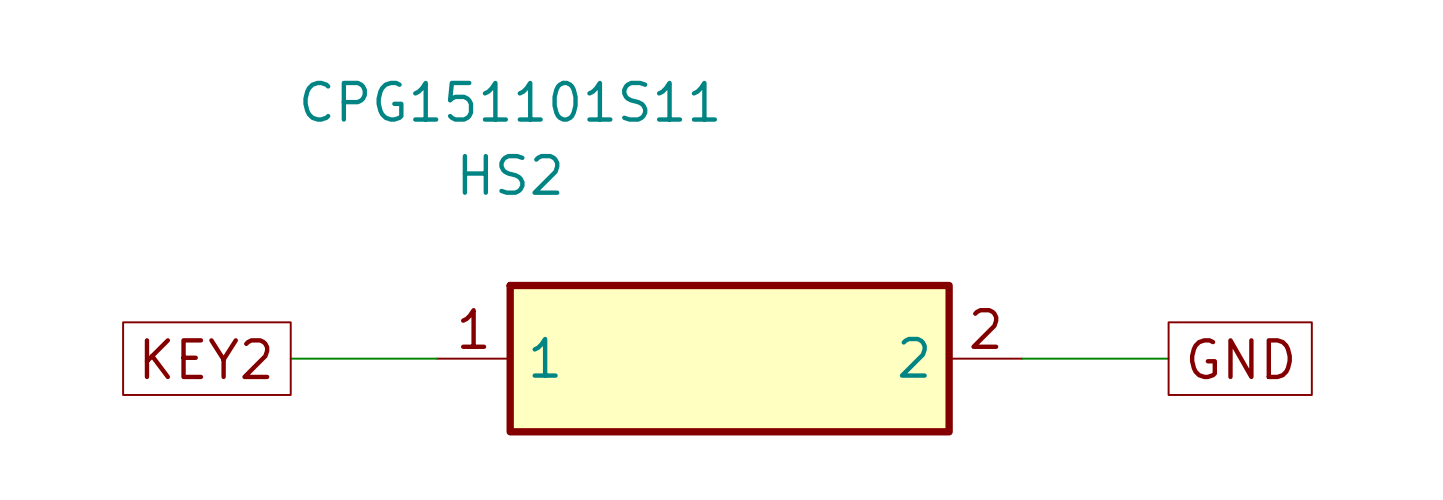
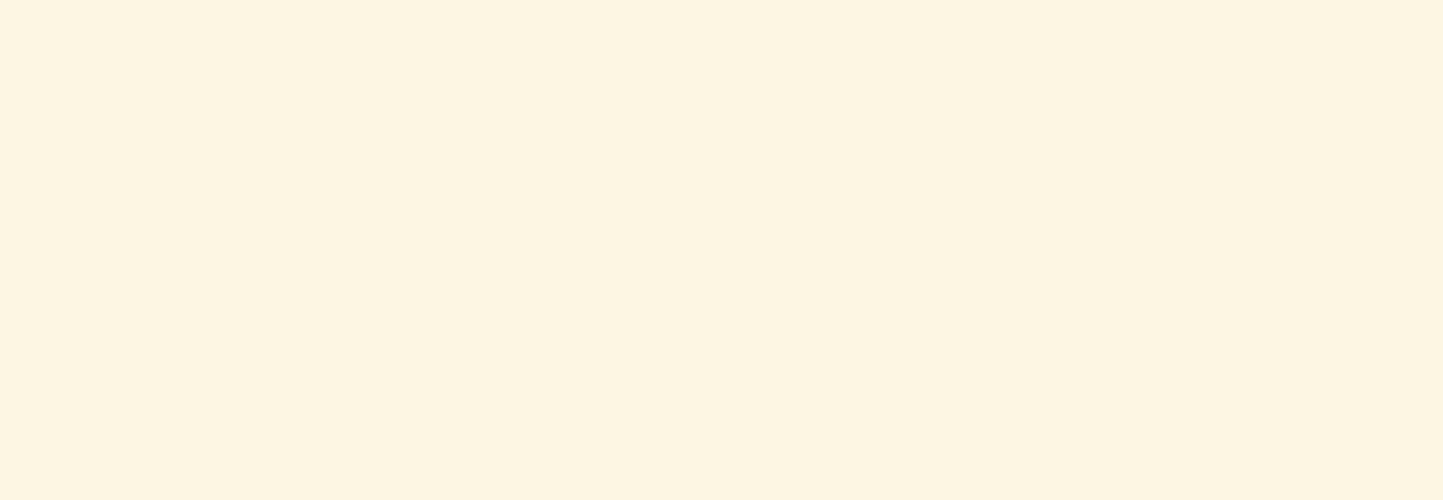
global label: KEY2 (207, 358) -> none
wire: (290, 358) (437, 358) -> none
HS2: CPG151101S11 (729, 358) -> none
wire: (1022, 358) (1168, 358) -> none
global label: GND (1240, 358) -> none

